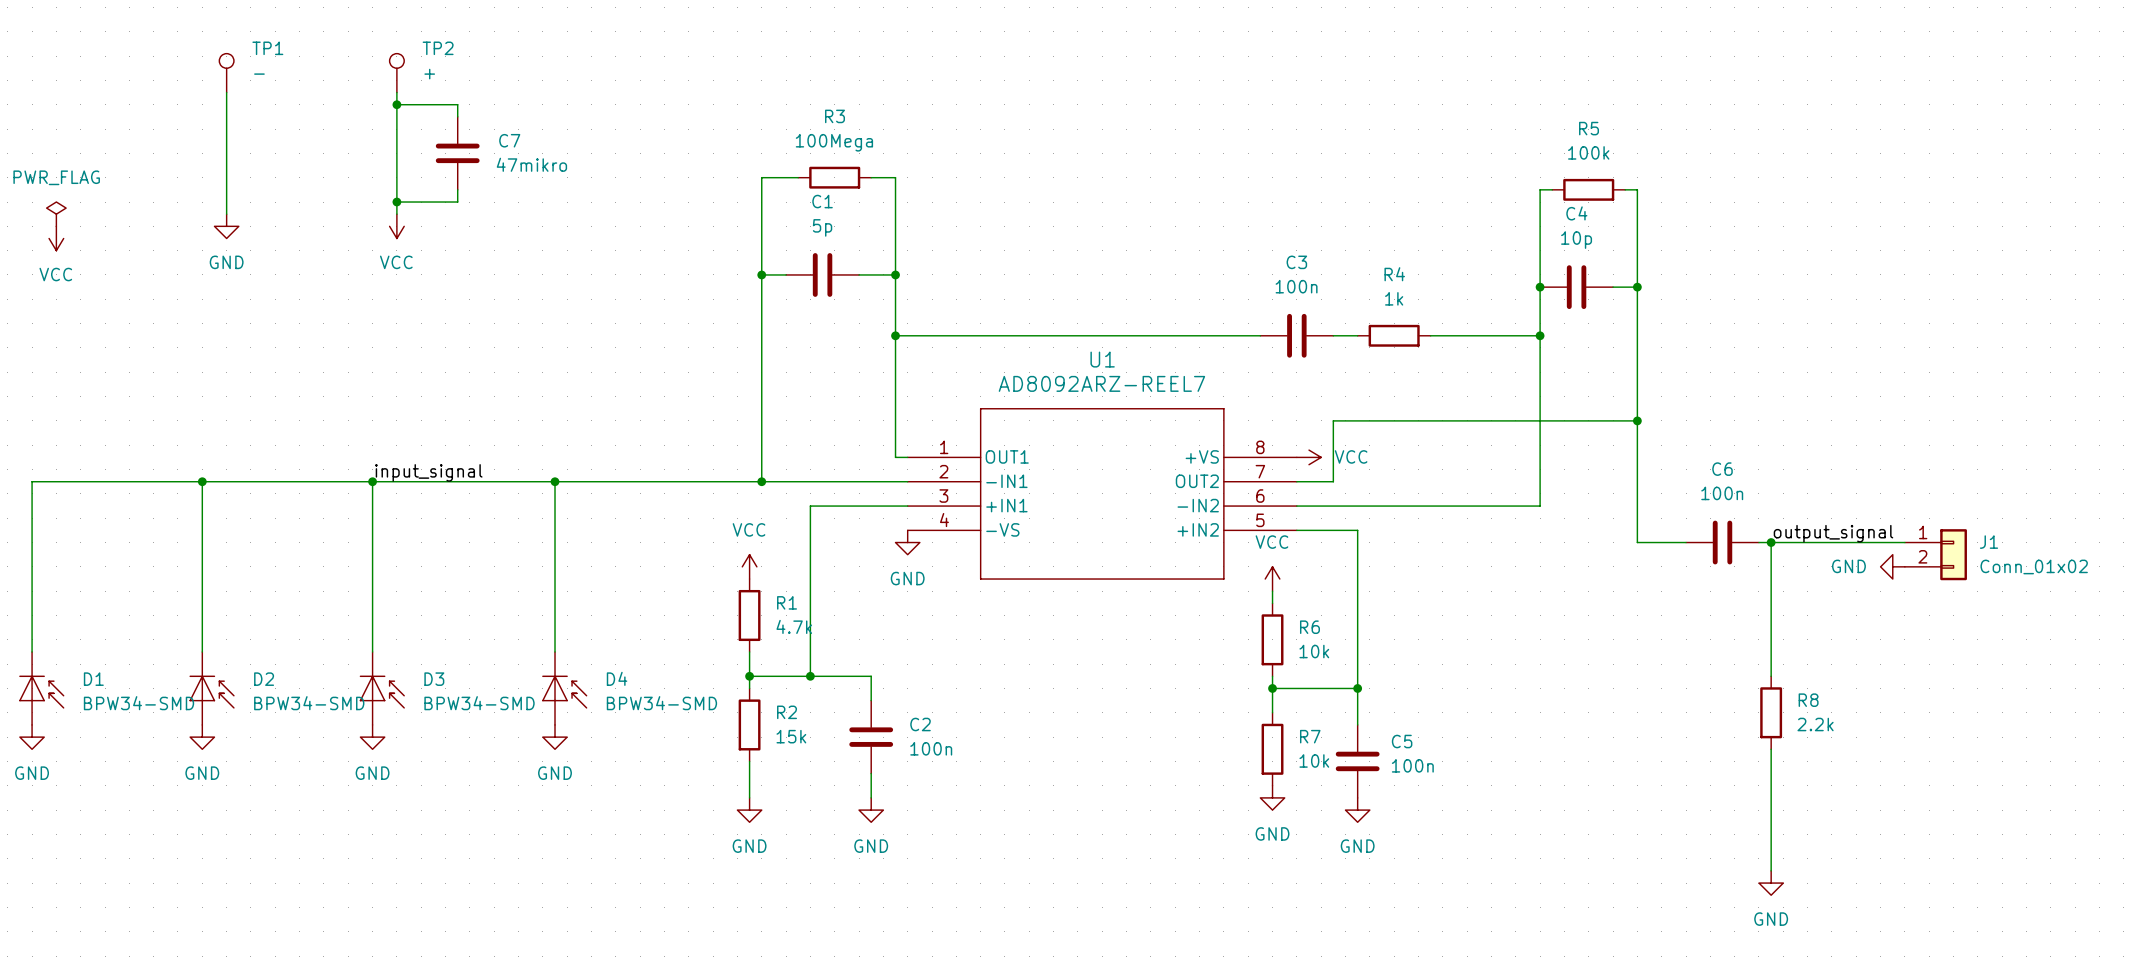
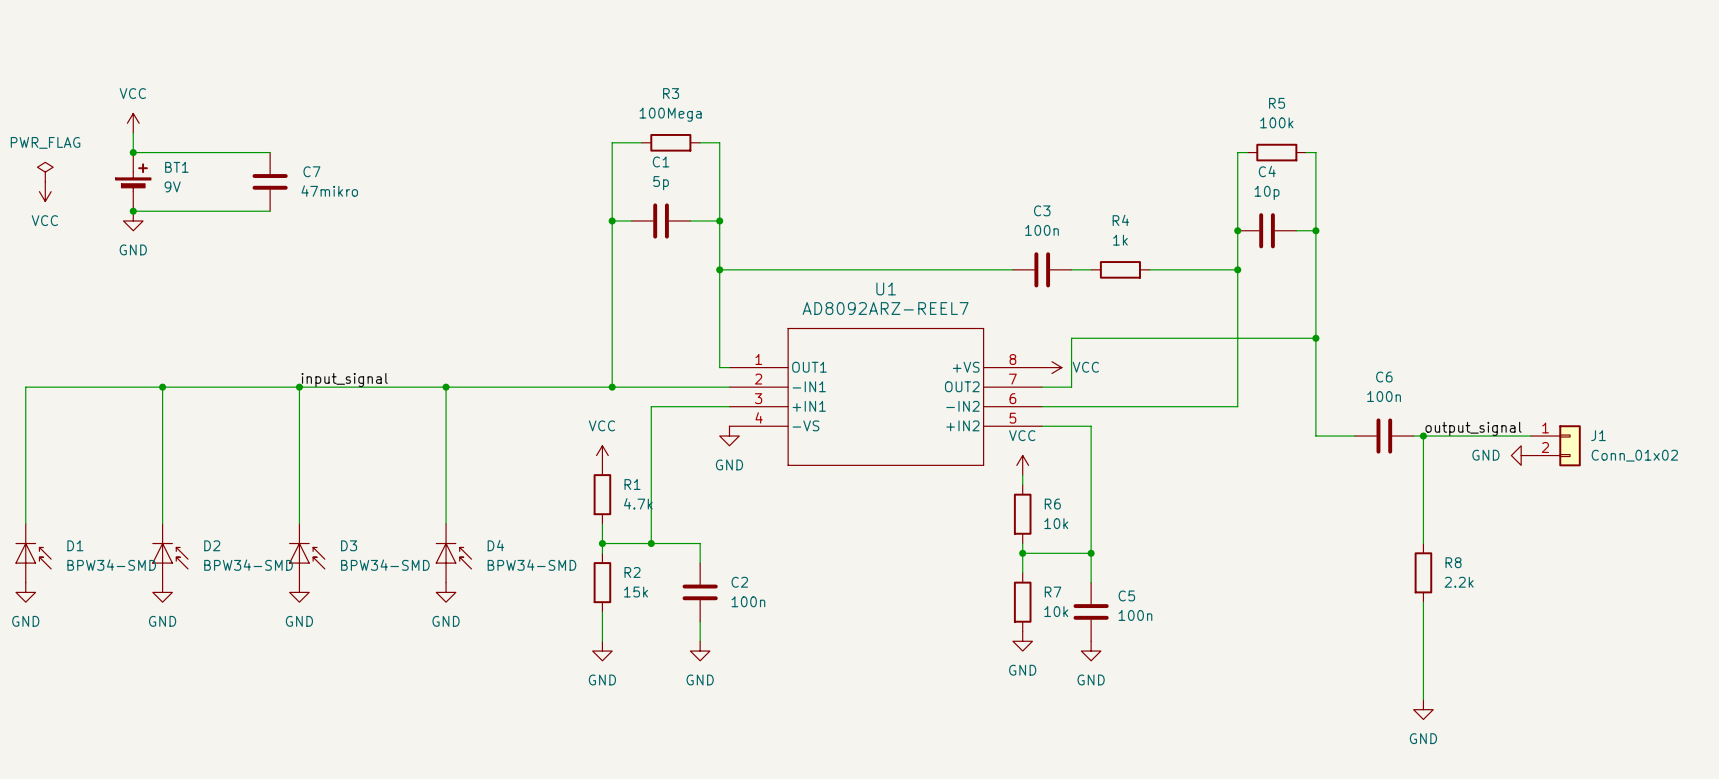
TP1: - (226, 73) -> none
TP2: + (396, 73) -> none
wire: (226, 92) (226, 214) -> none
wire: (396, 92) (396, 214) -> none
wire: (396, 104) (457, 104) (457, 116) -> none
junction: (396, 104) -> none
power symbol: none -> VCC (133, 123)
C7 position: (457, 153) -> (270, 181)
wire: none -> (133, 133) (133, 152) (270, 152)
junction: none -> (133, 152)
wire: (457, 189) (457, 202) (396, 202) -> none
junction: (396, 202) -> none
BT1: none -> 9V (133, 181)
power symbol position: GND (226, 226) -> GND (133, 220)
power symbol: VCC (396, 226) -> none
wire: none -> (133, 211) (270, 211)
junction: none -> (133, 211)

